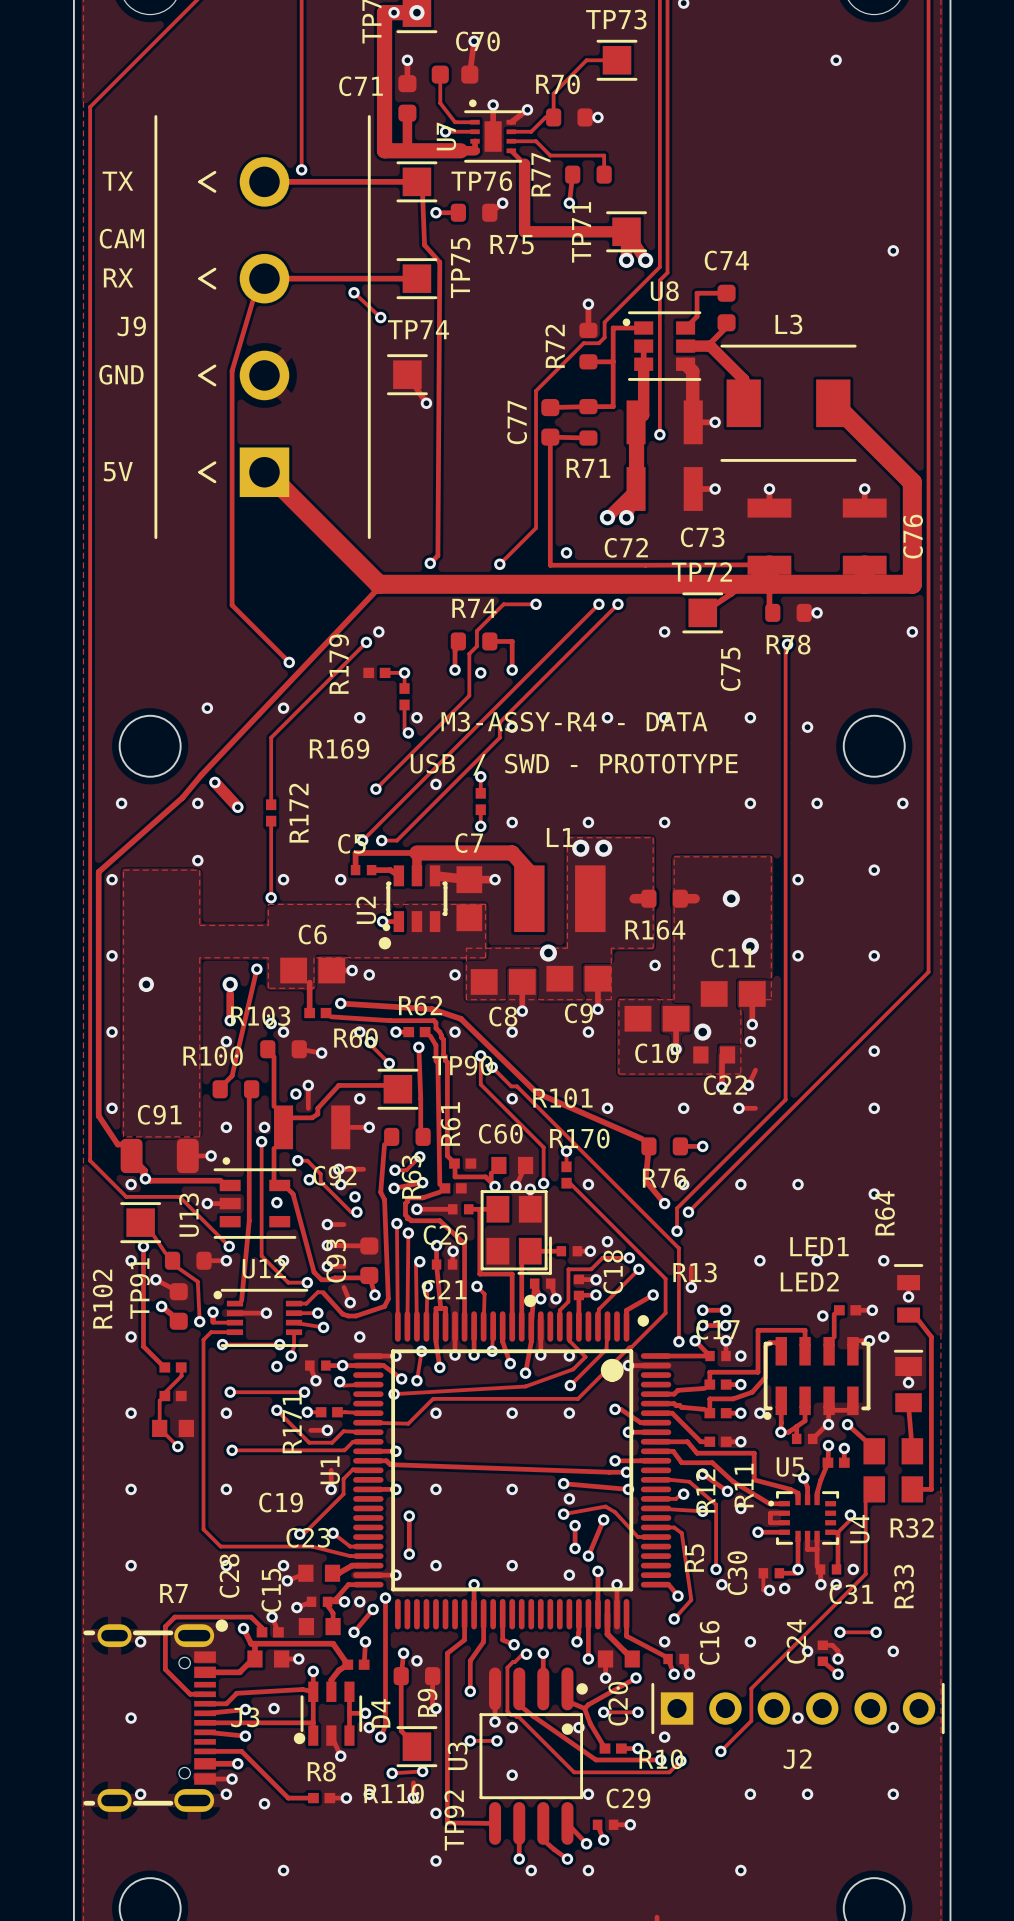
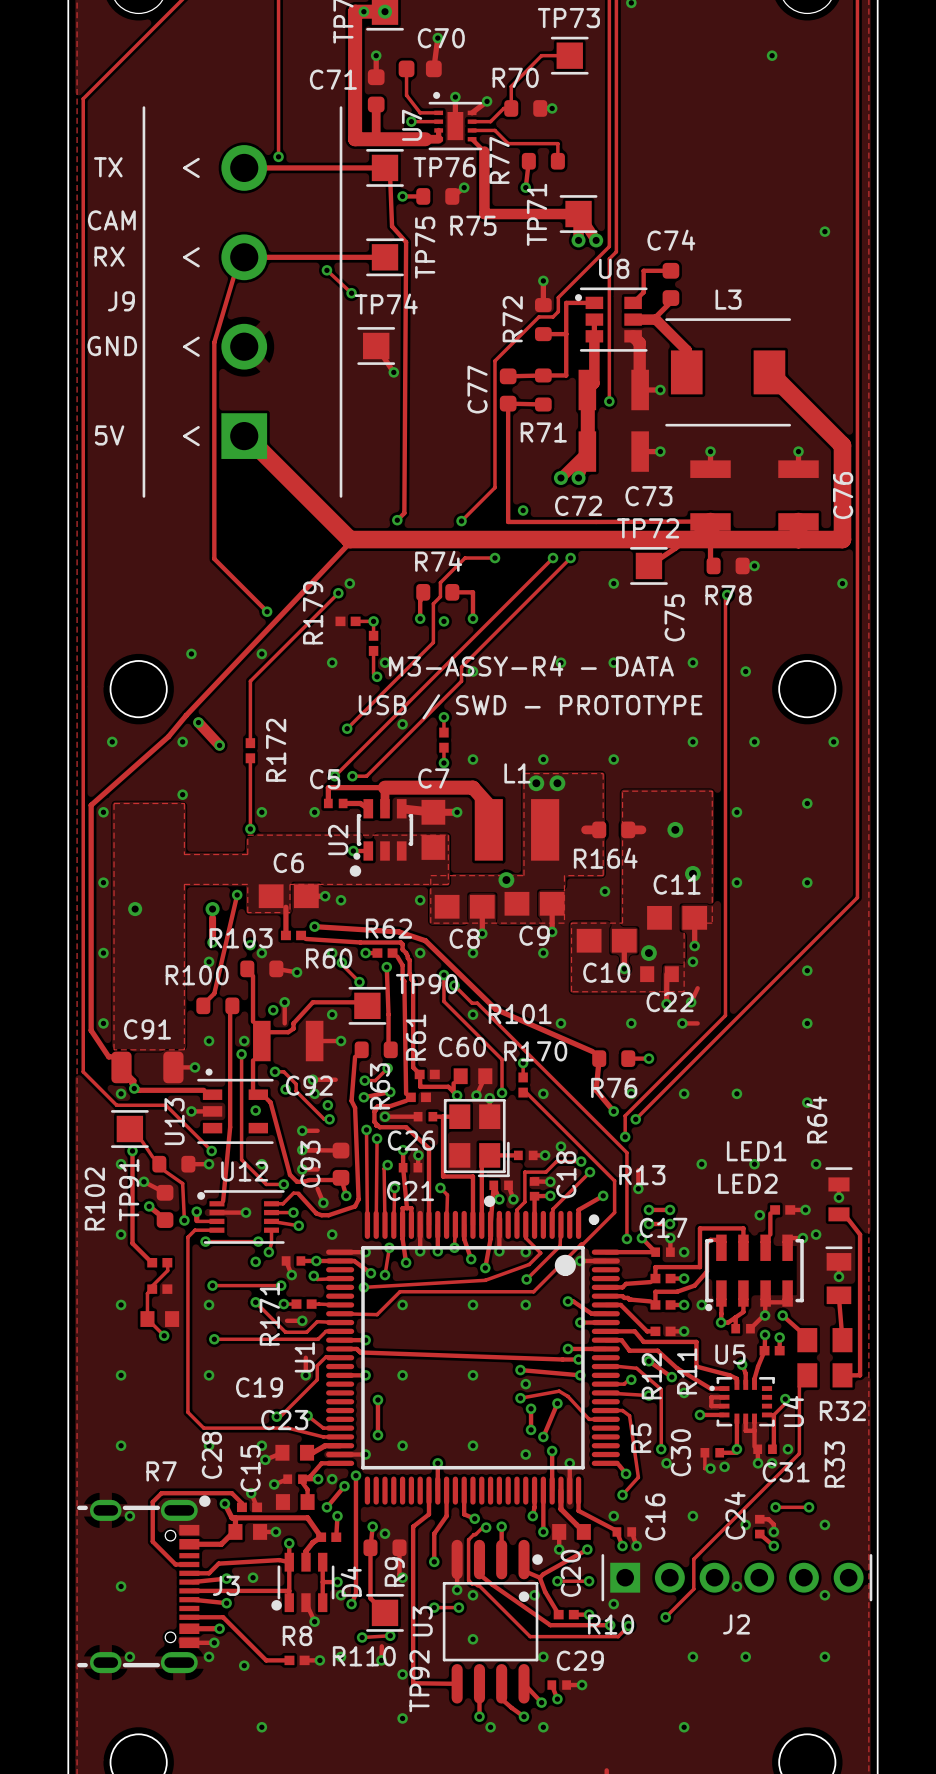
R169 name: R169 (339, 748) -> none

